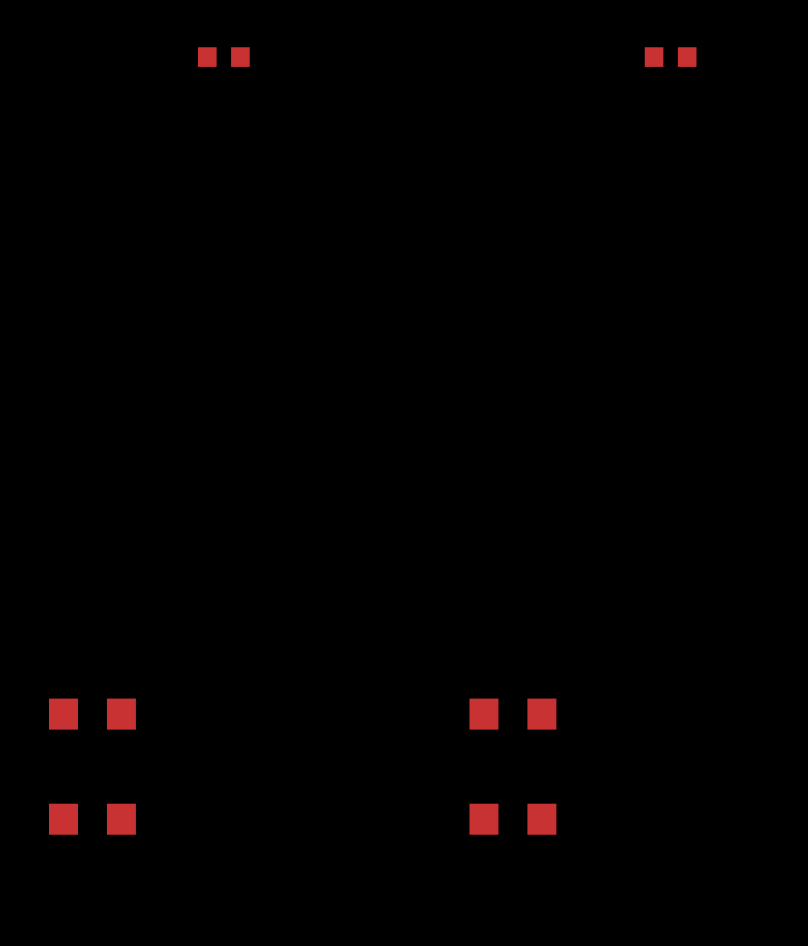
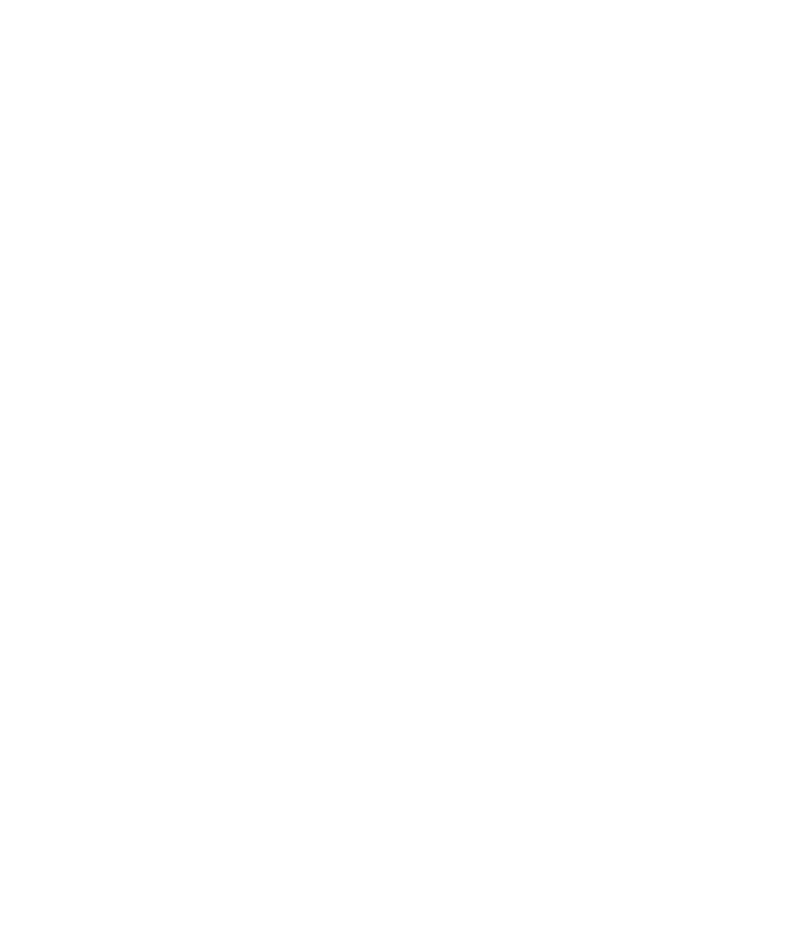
part: (223, 57) -> none
part: (670, 57) -> none
part: (92, 714) -> none
part: (512, 714) -> none
part: (92, 819) -> none
part: (512, 819) -> none

